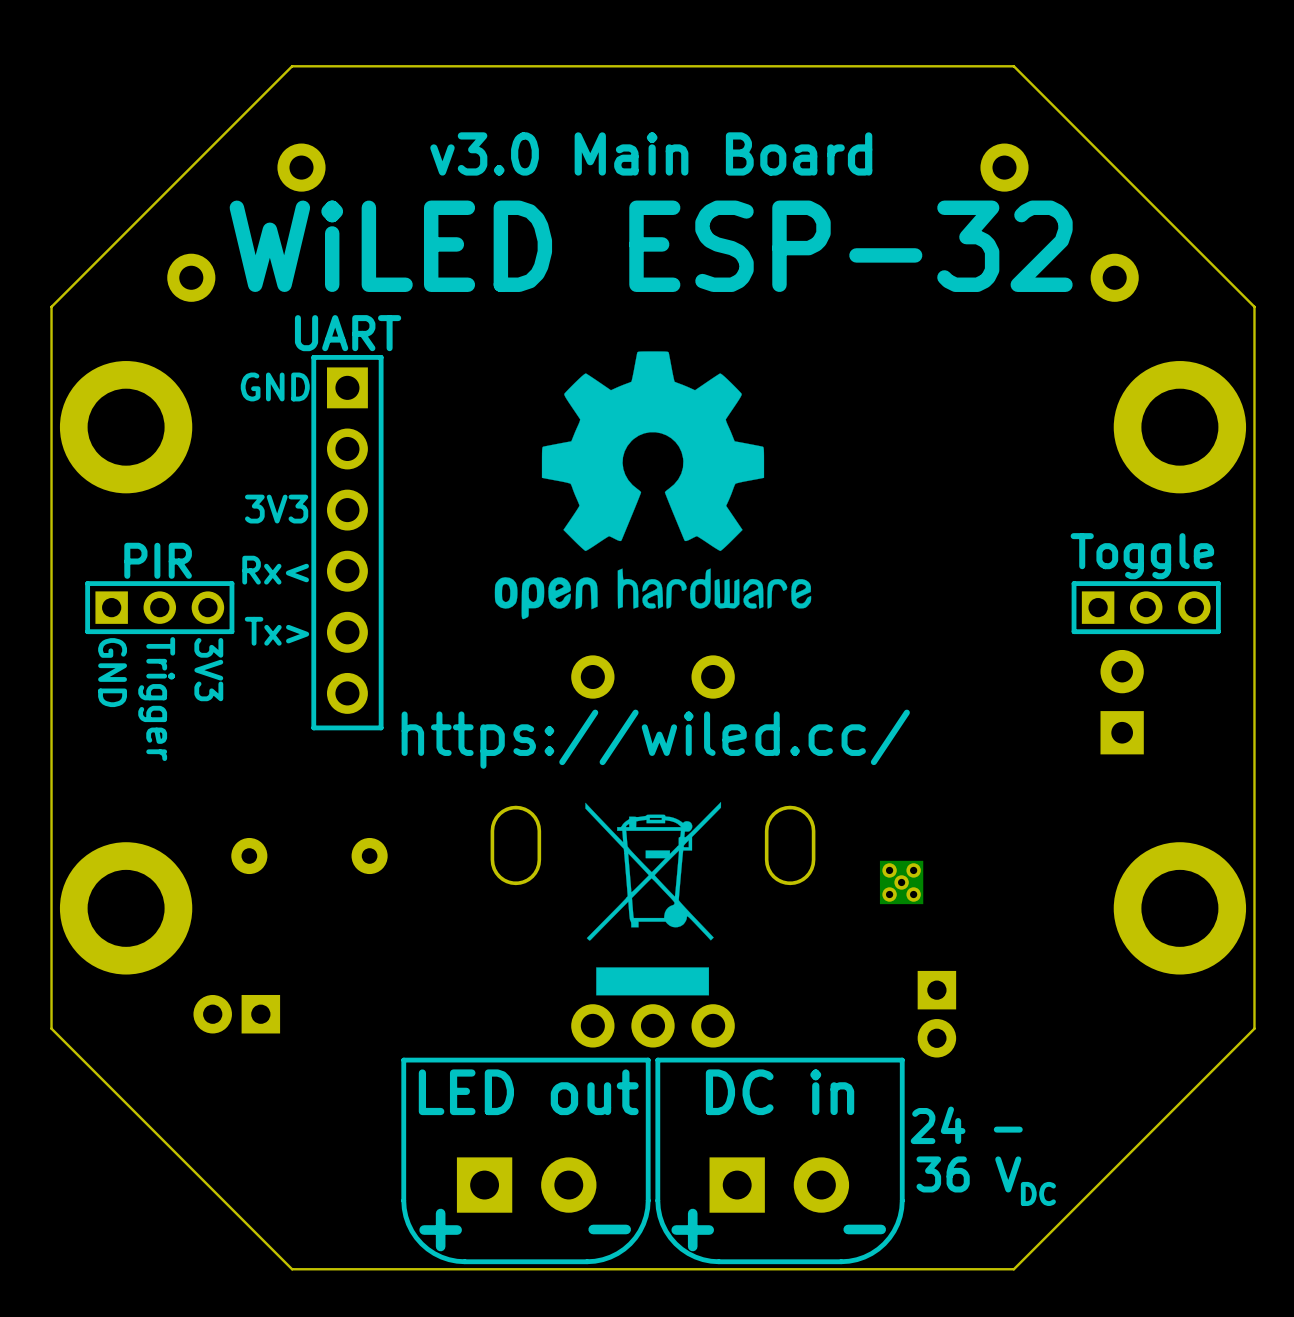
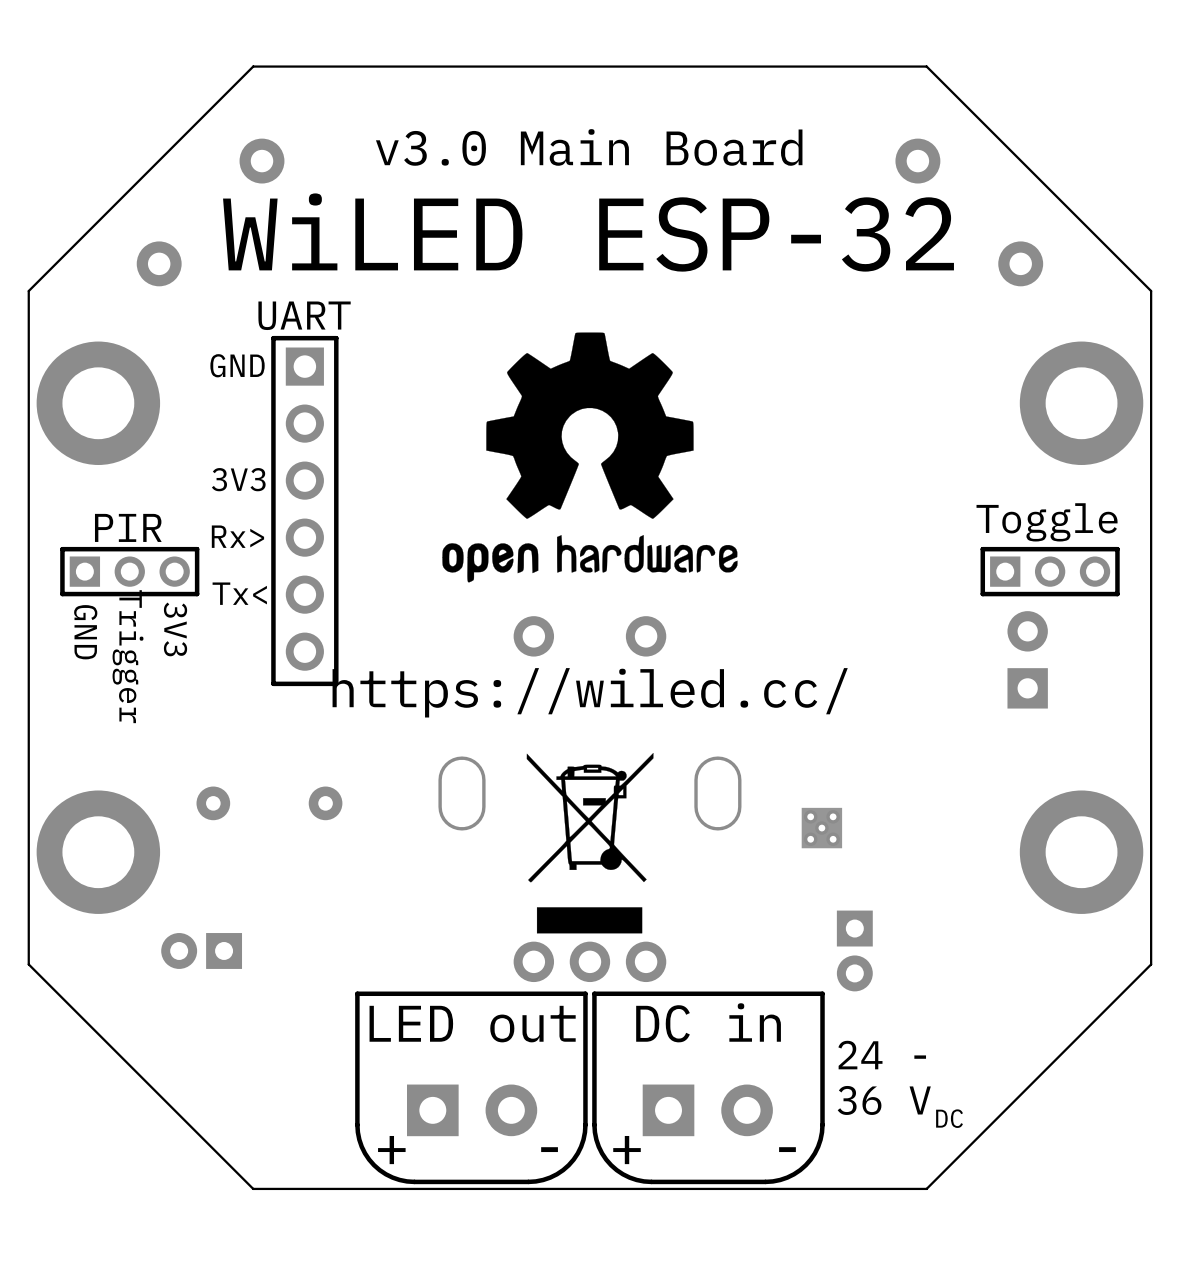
text: Rx< (275, 570) -> Rx> (237, 536)
text: Tx> (276, 631) -> Tx< (239, 593)

